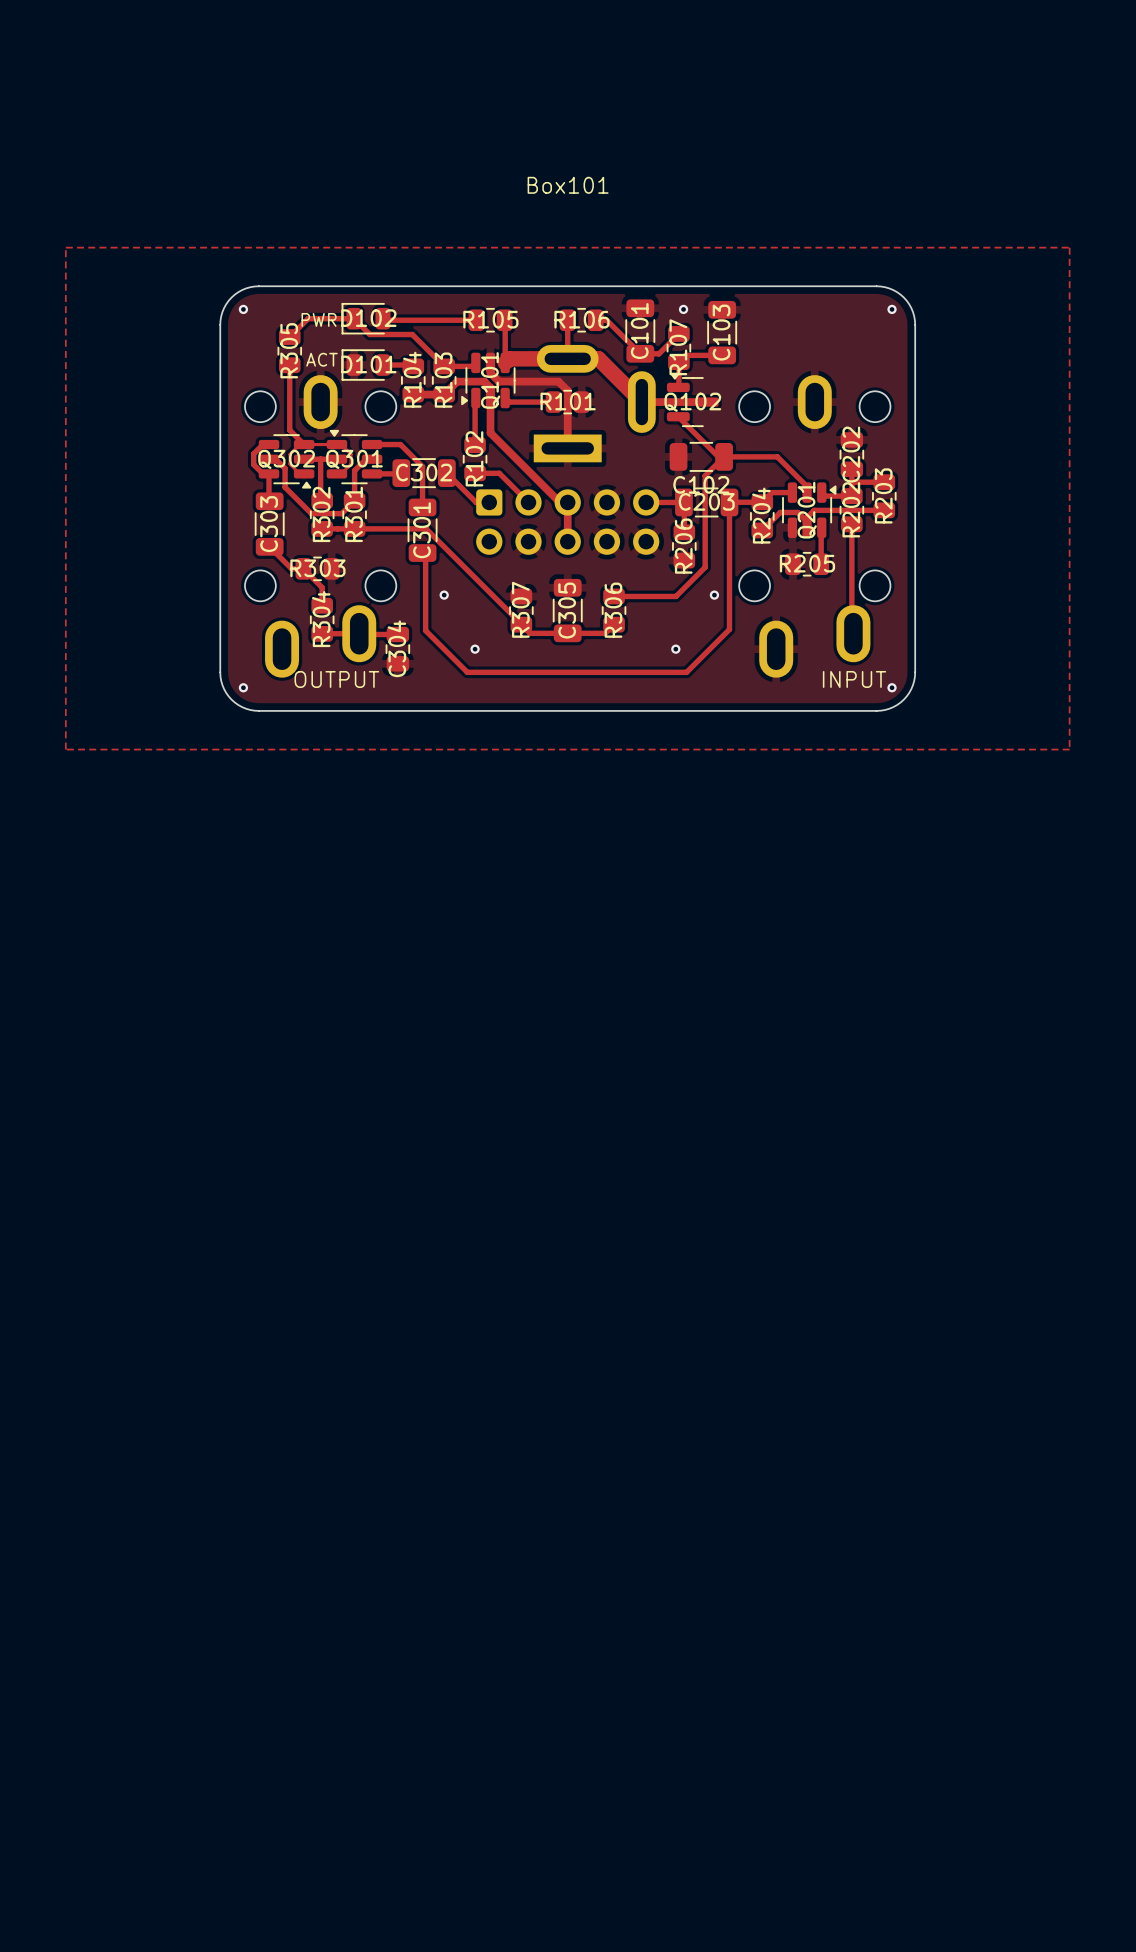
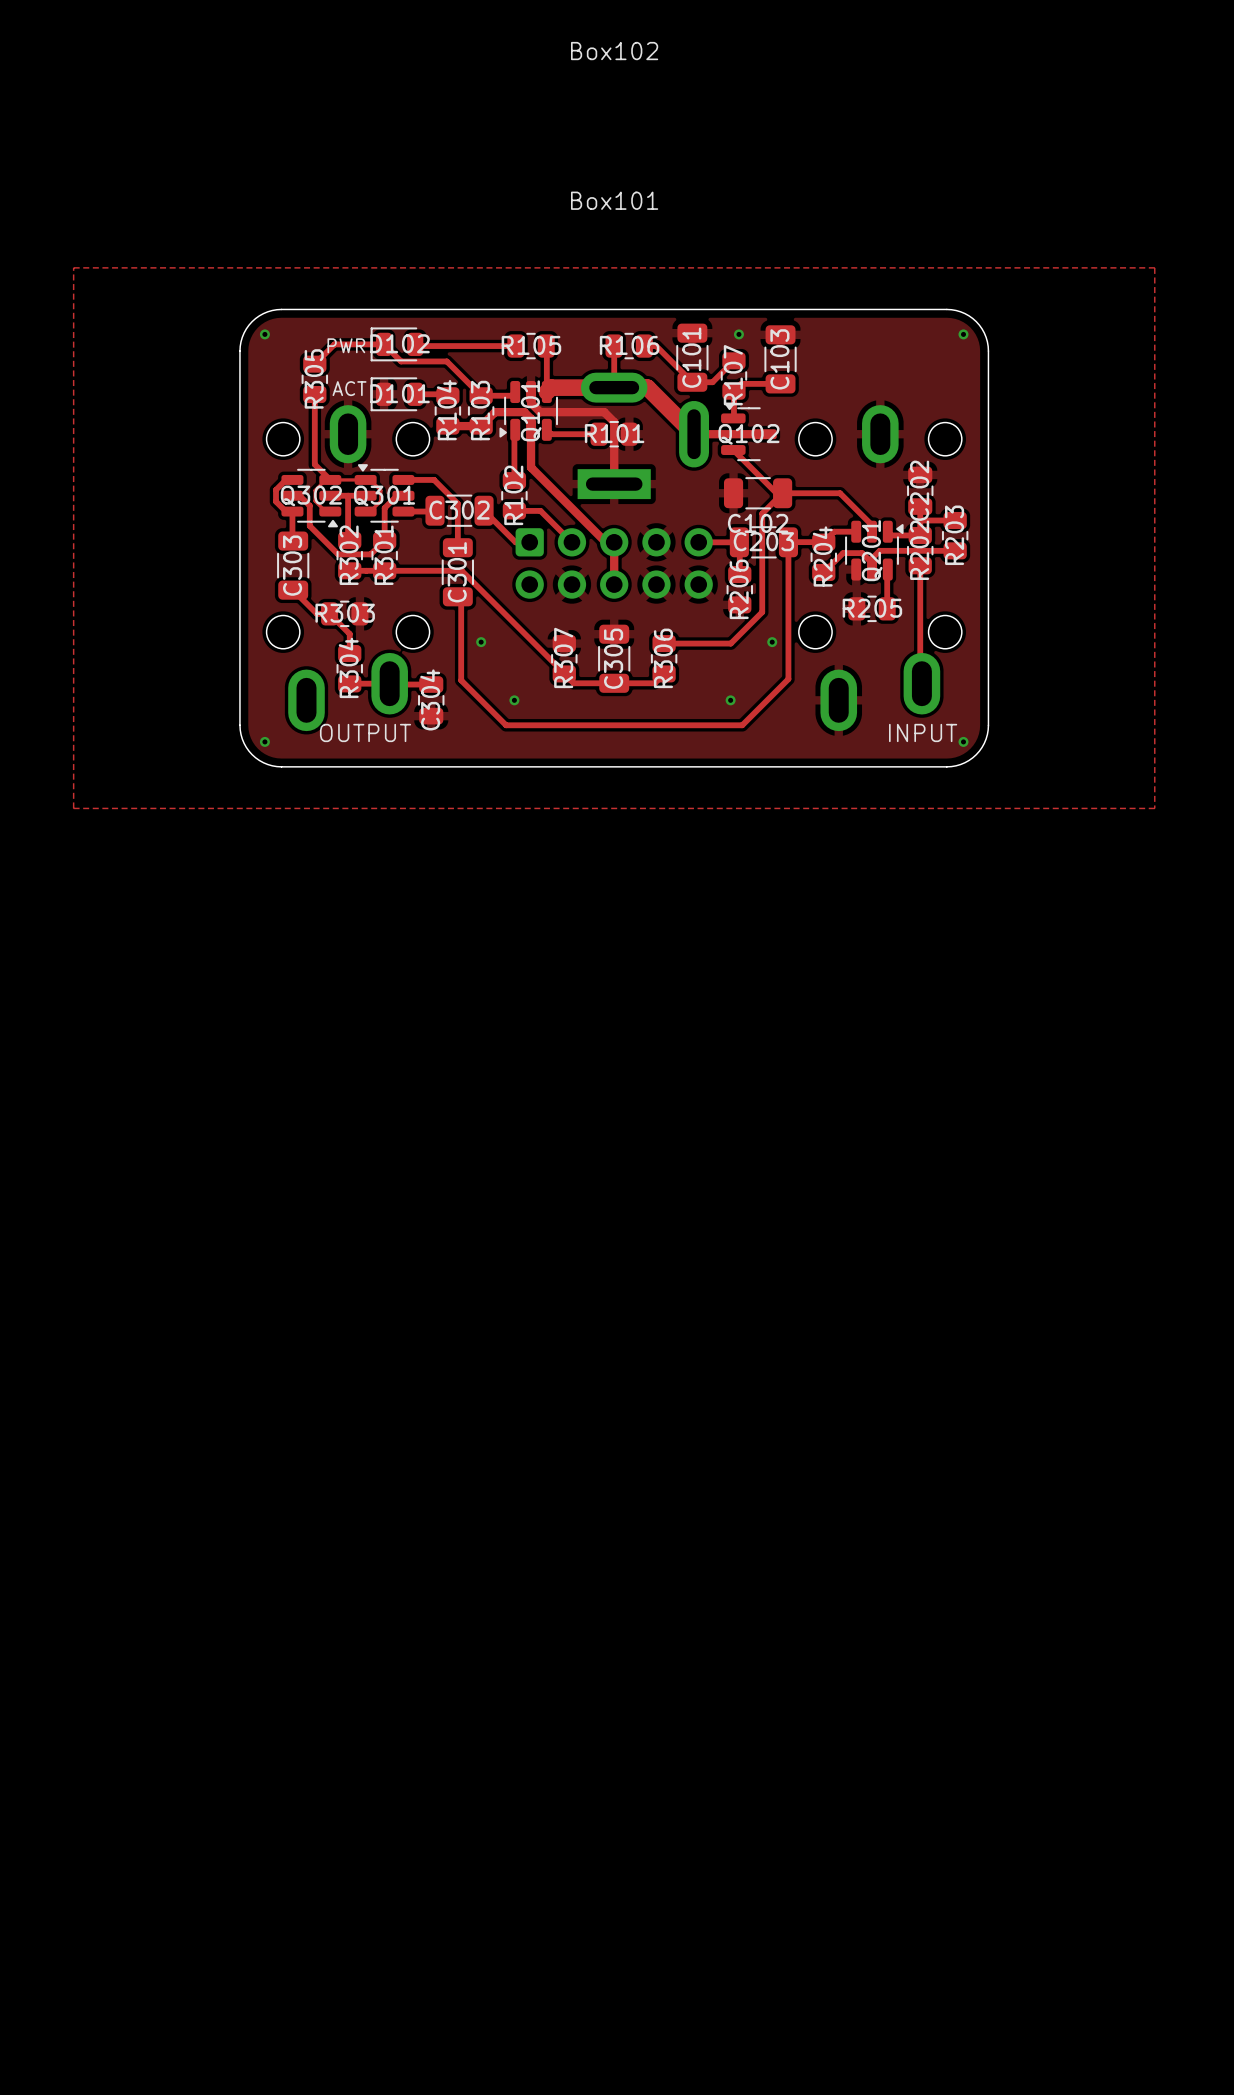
Box102: none -> (615, 2020)

